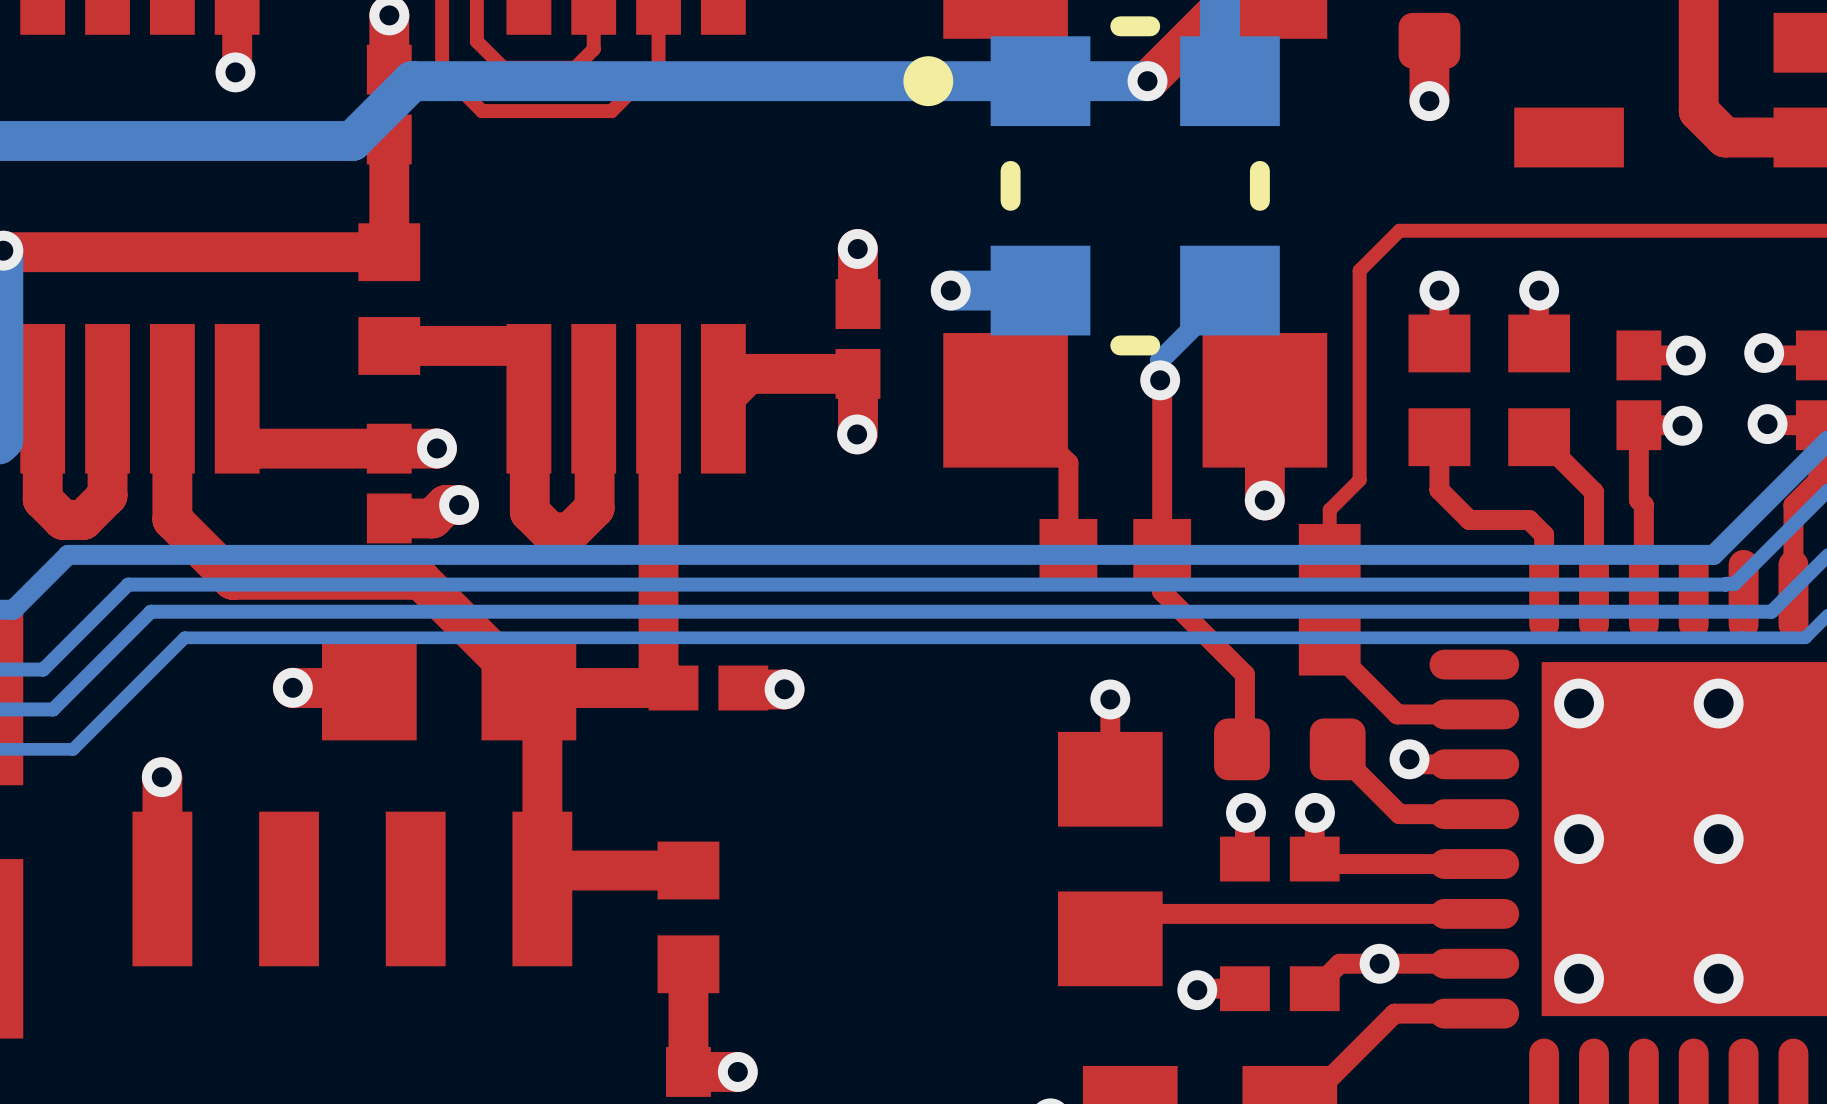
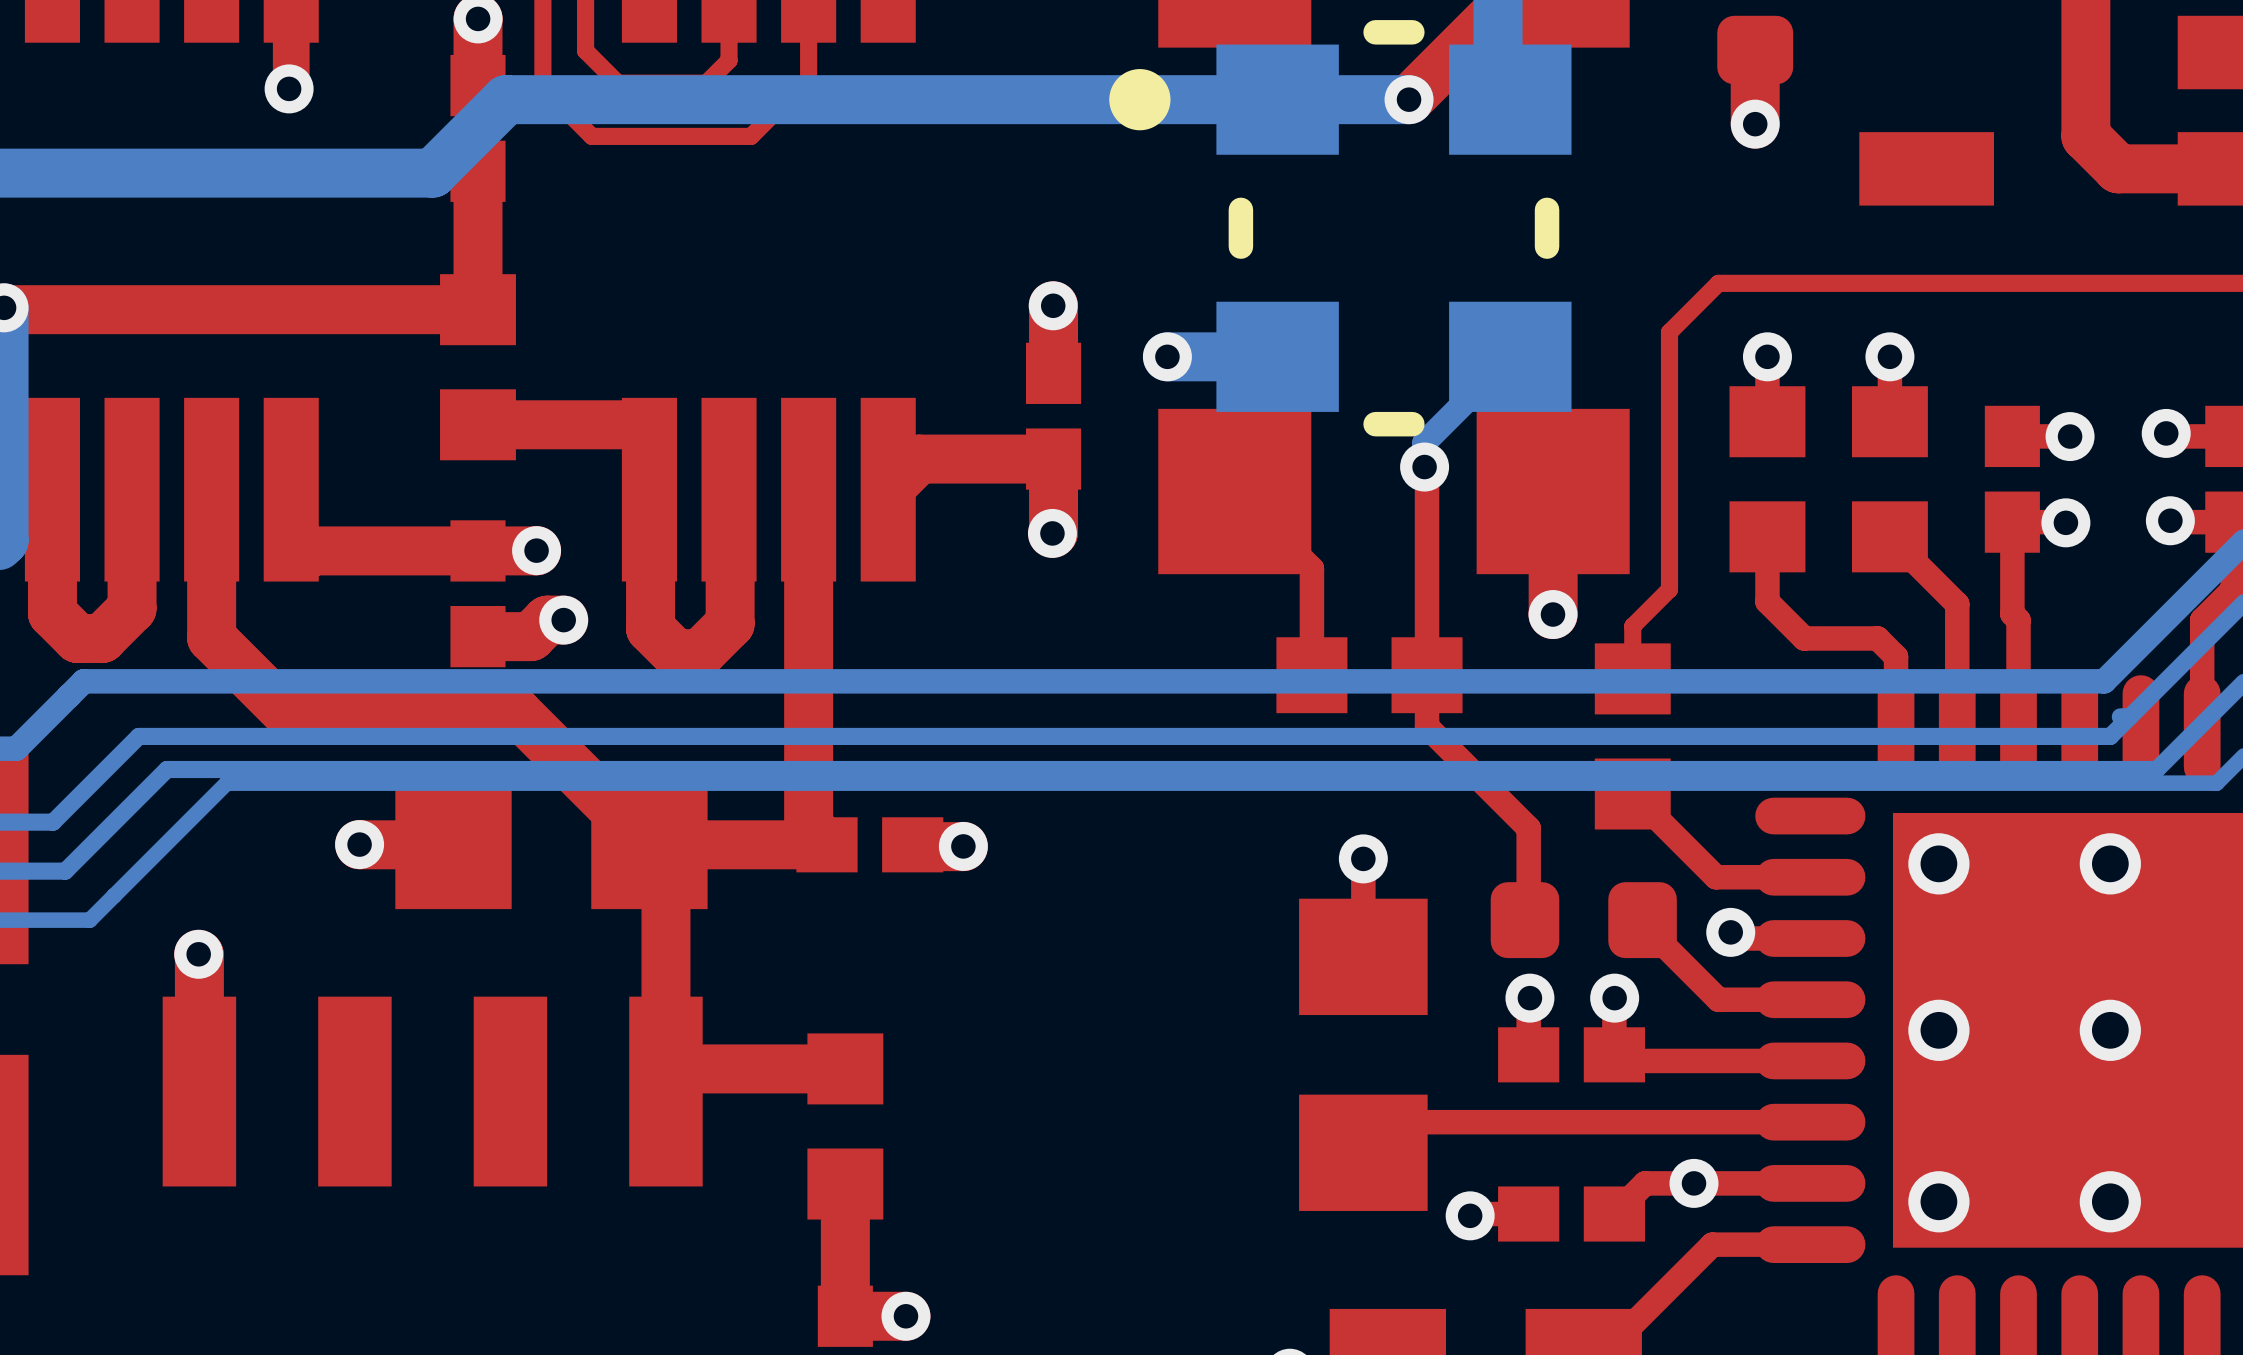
bottom track: (1725, 584) (128, 584) (113, 599) -> (2129, 716) (2110, 736) (138, 736)
bottom track: (1771, 611) (150, 611) (135, 626) -> (2175, 751) (2156, 769) (166, 769)

